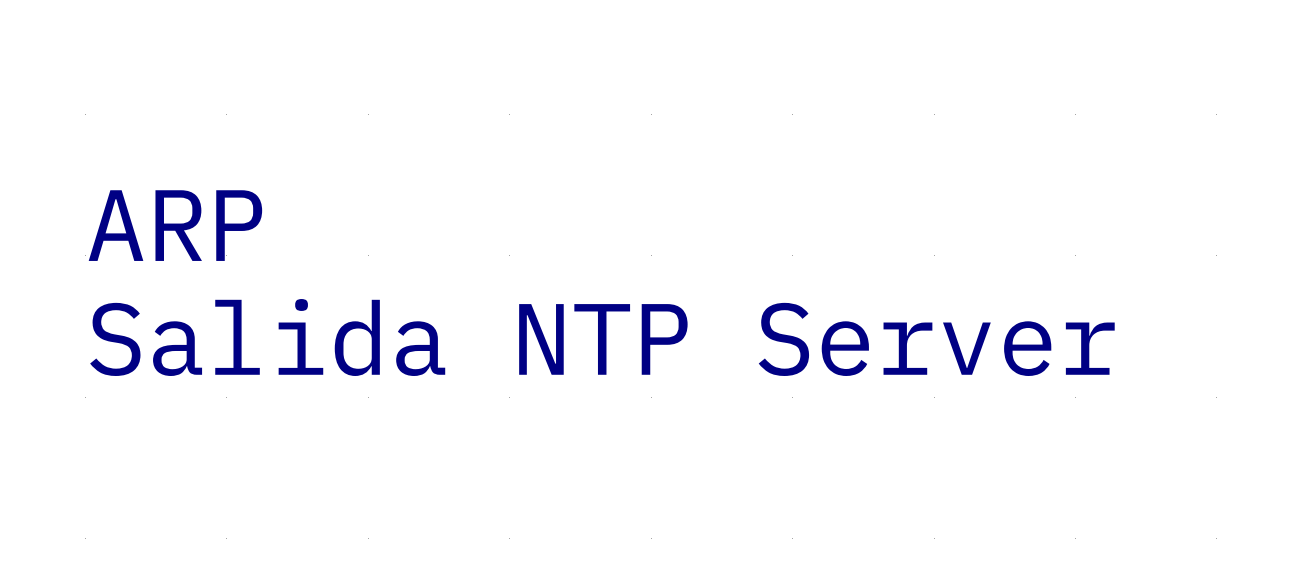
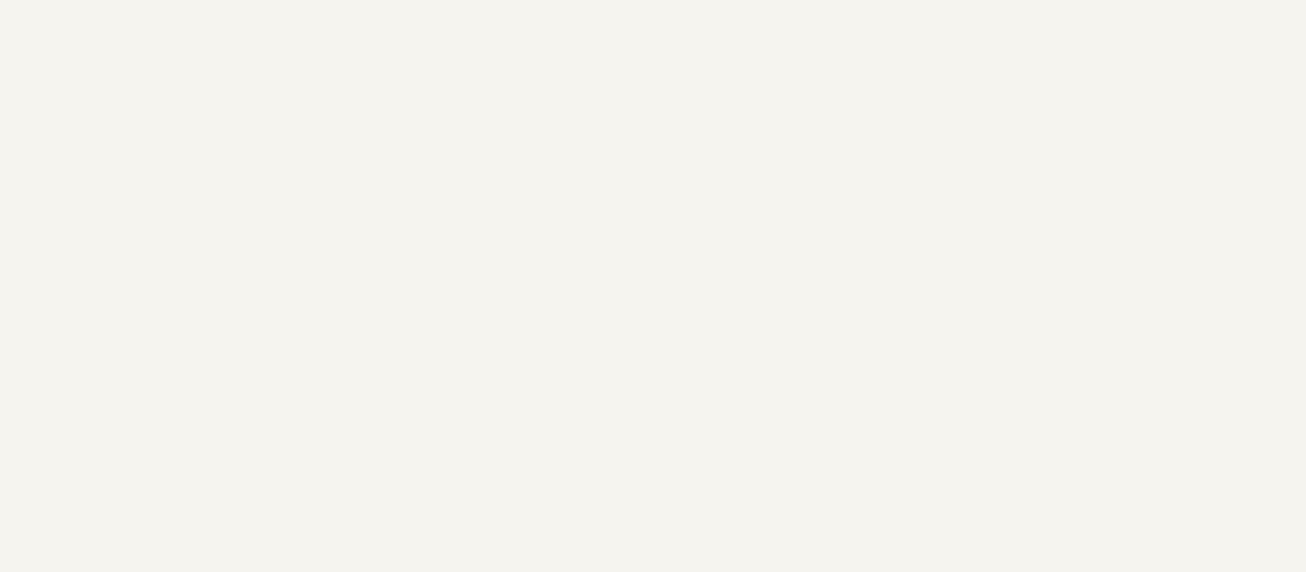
text: ARP (175, 225) -> none
text: Salida NTP Server (602, 337) -> none

